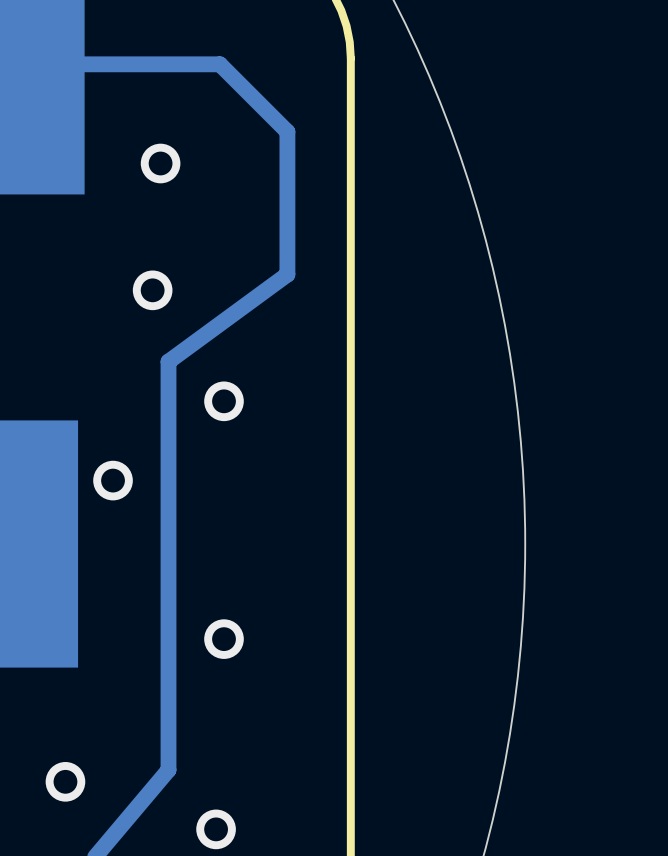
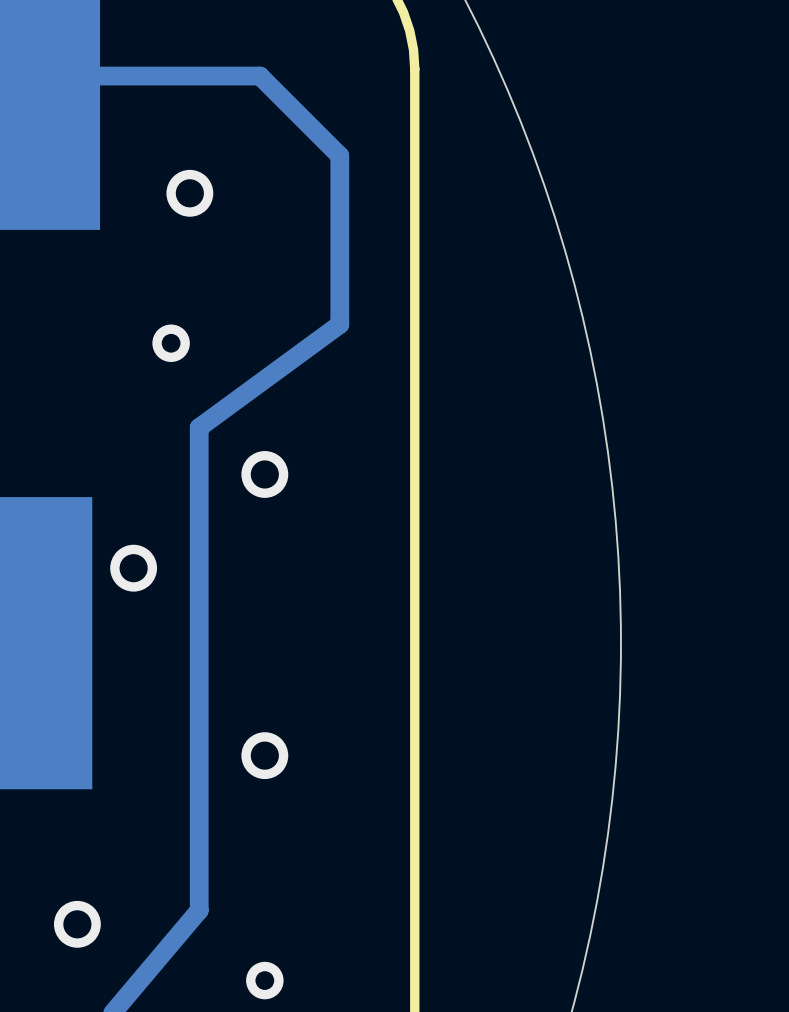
via size: [132, 270, 173, 311] -> [152, 324, 190, 363]
via size: [196, 809, 236, 850] -> [246, 961, 284, 1000]

